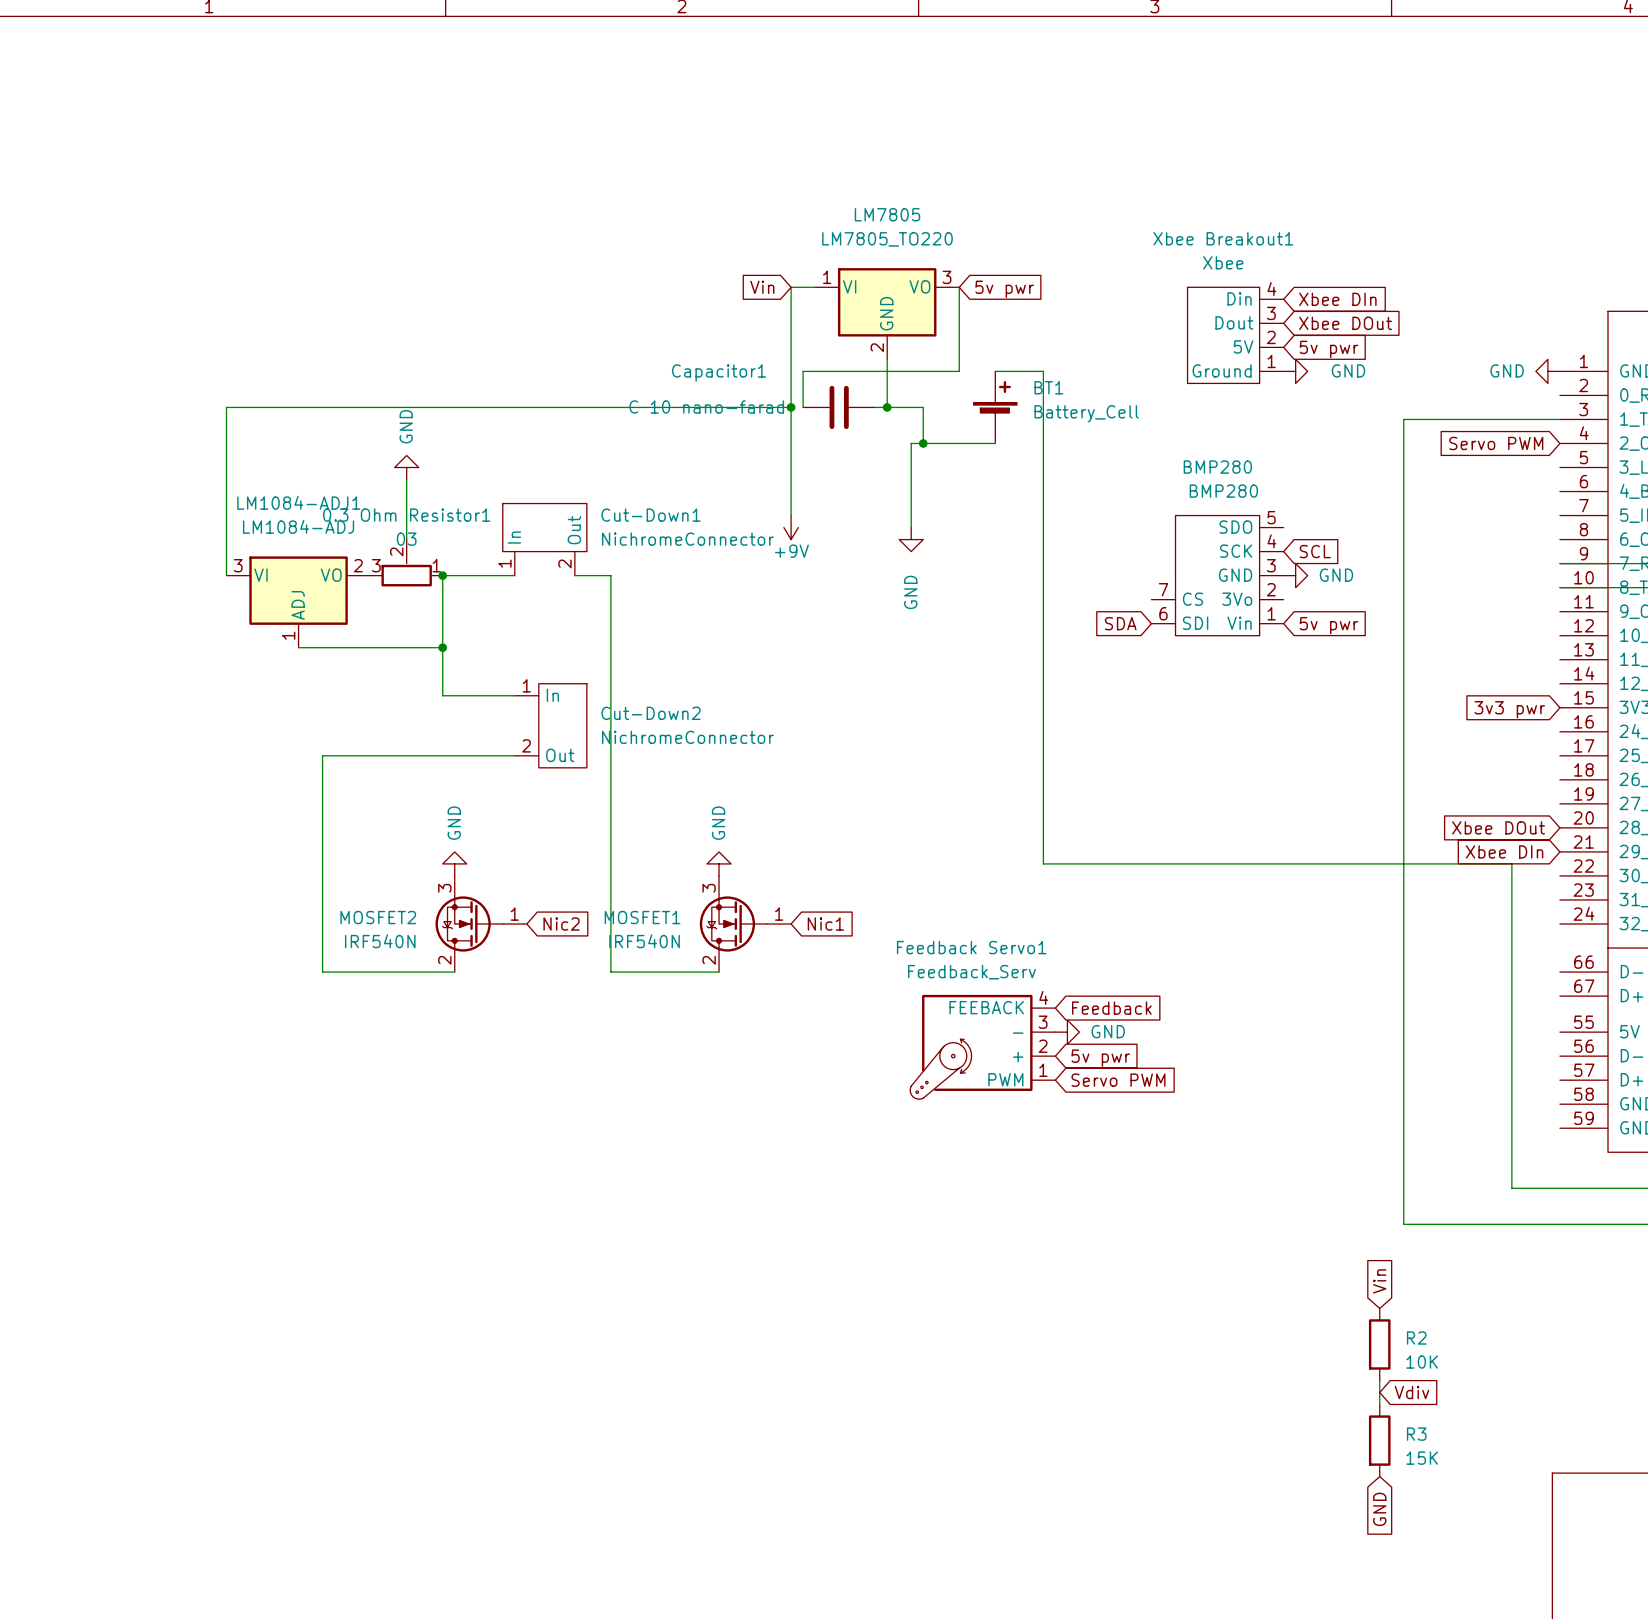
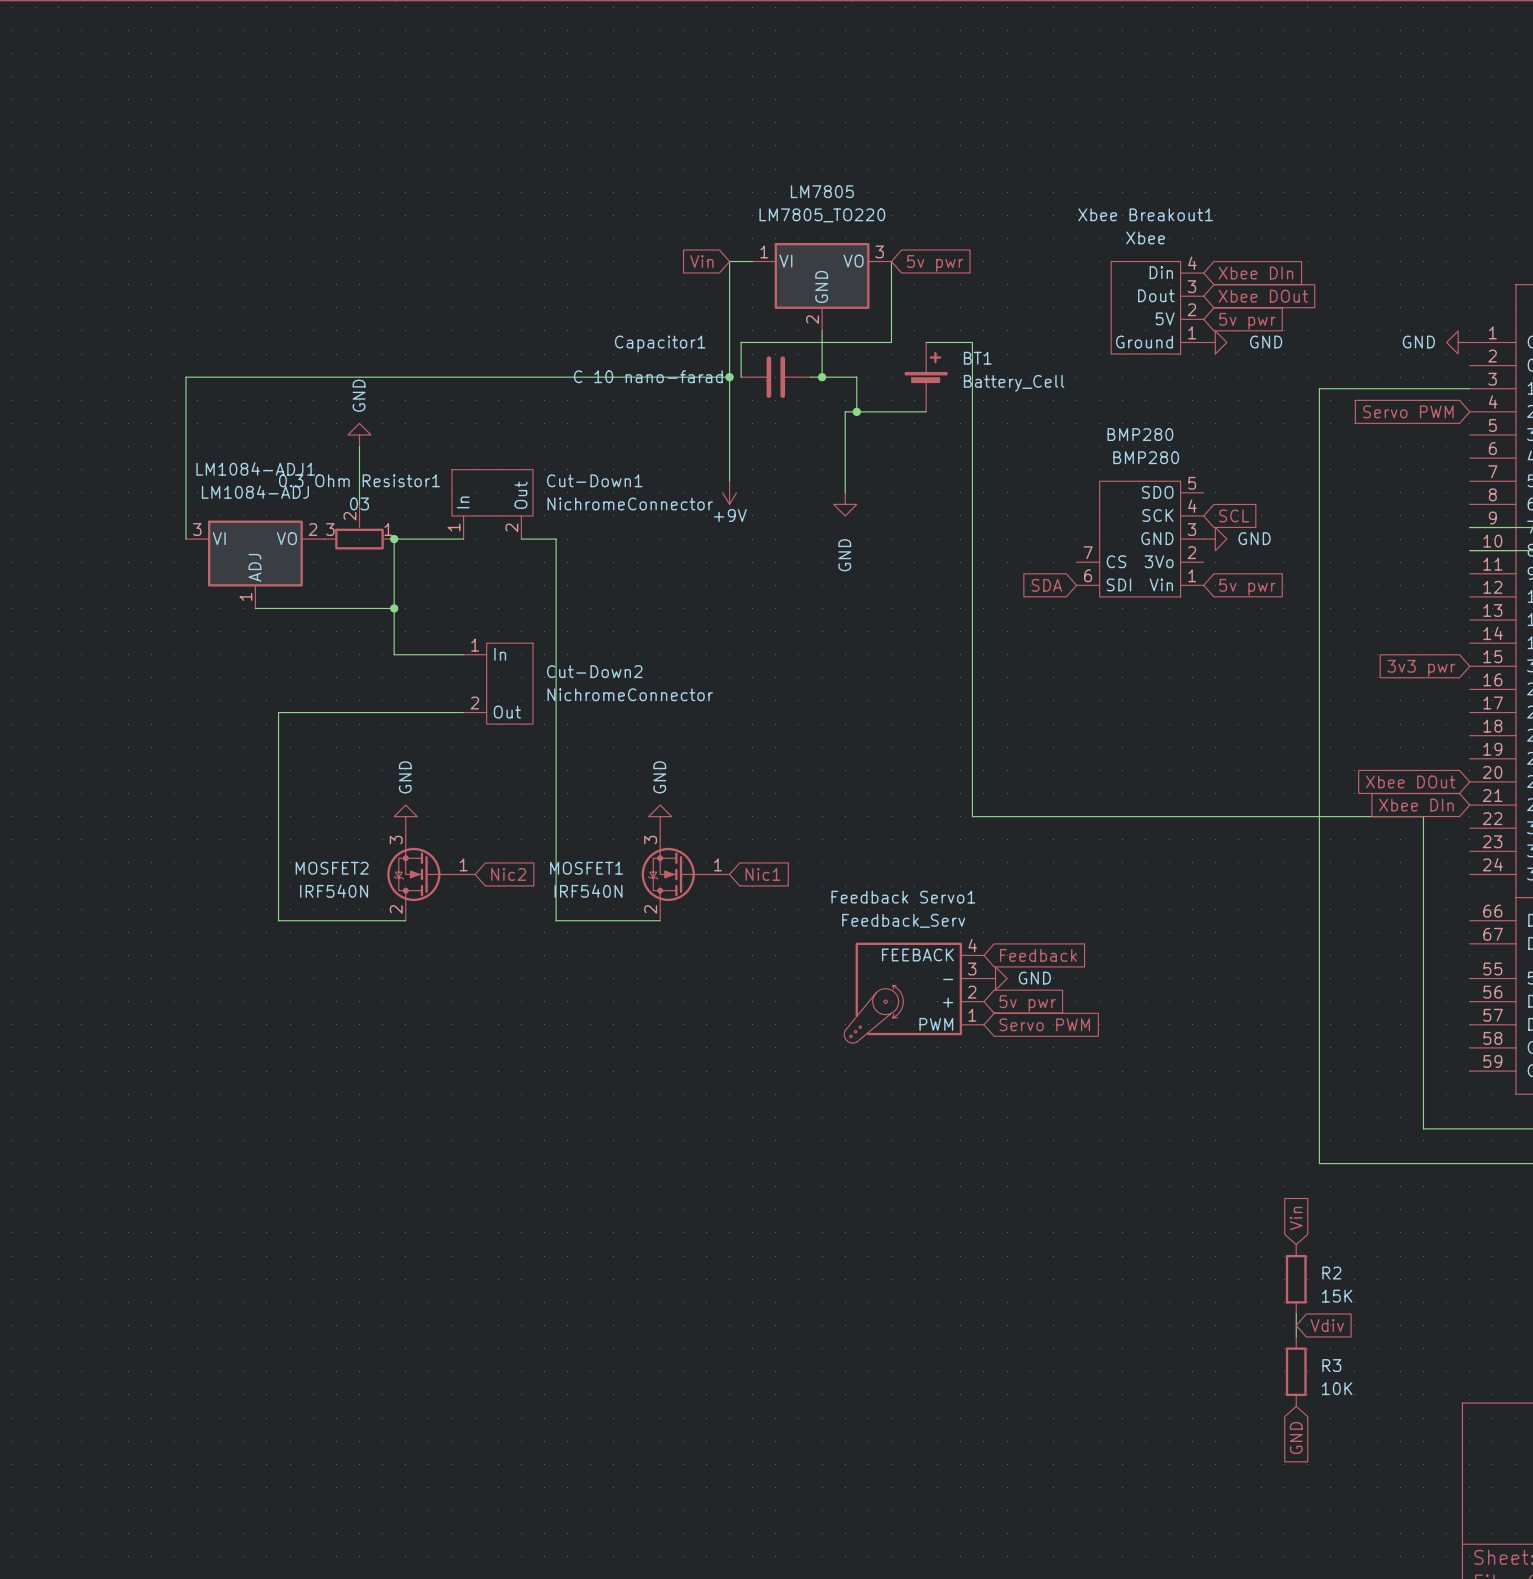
R2 value: 10K (1422, 1362) -> 15K (1337, 1296)
R3 value: 15K (1422, 1458) -> 10K (1337, 1388)

